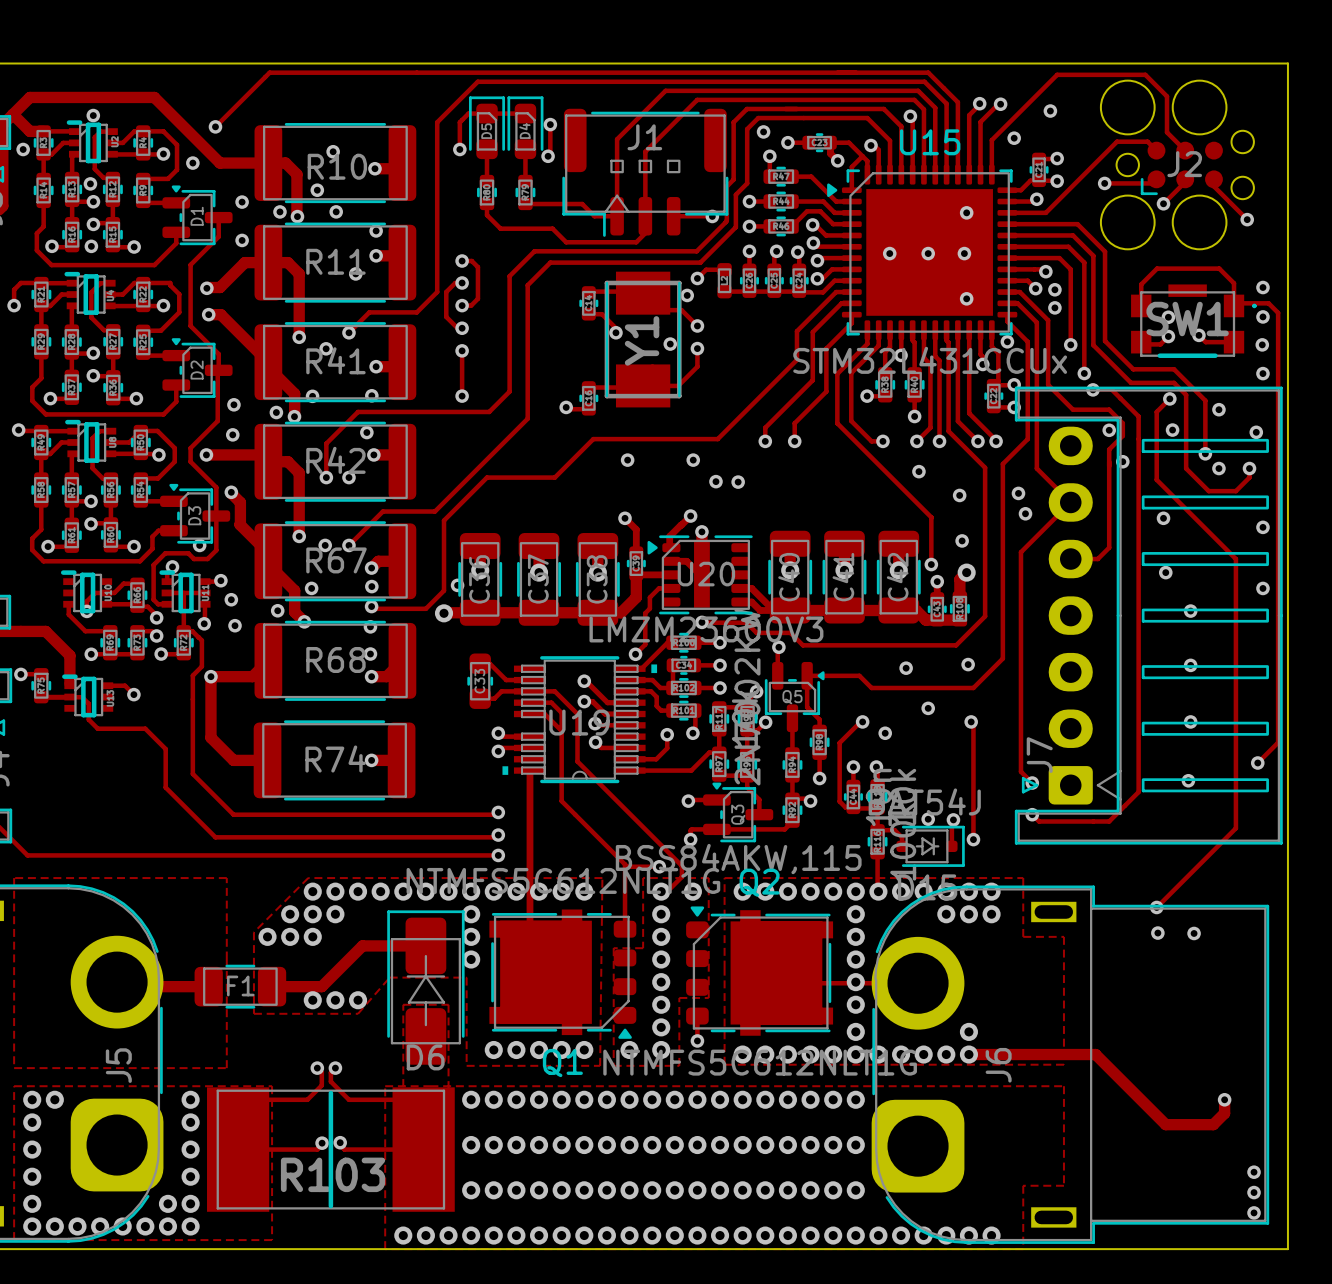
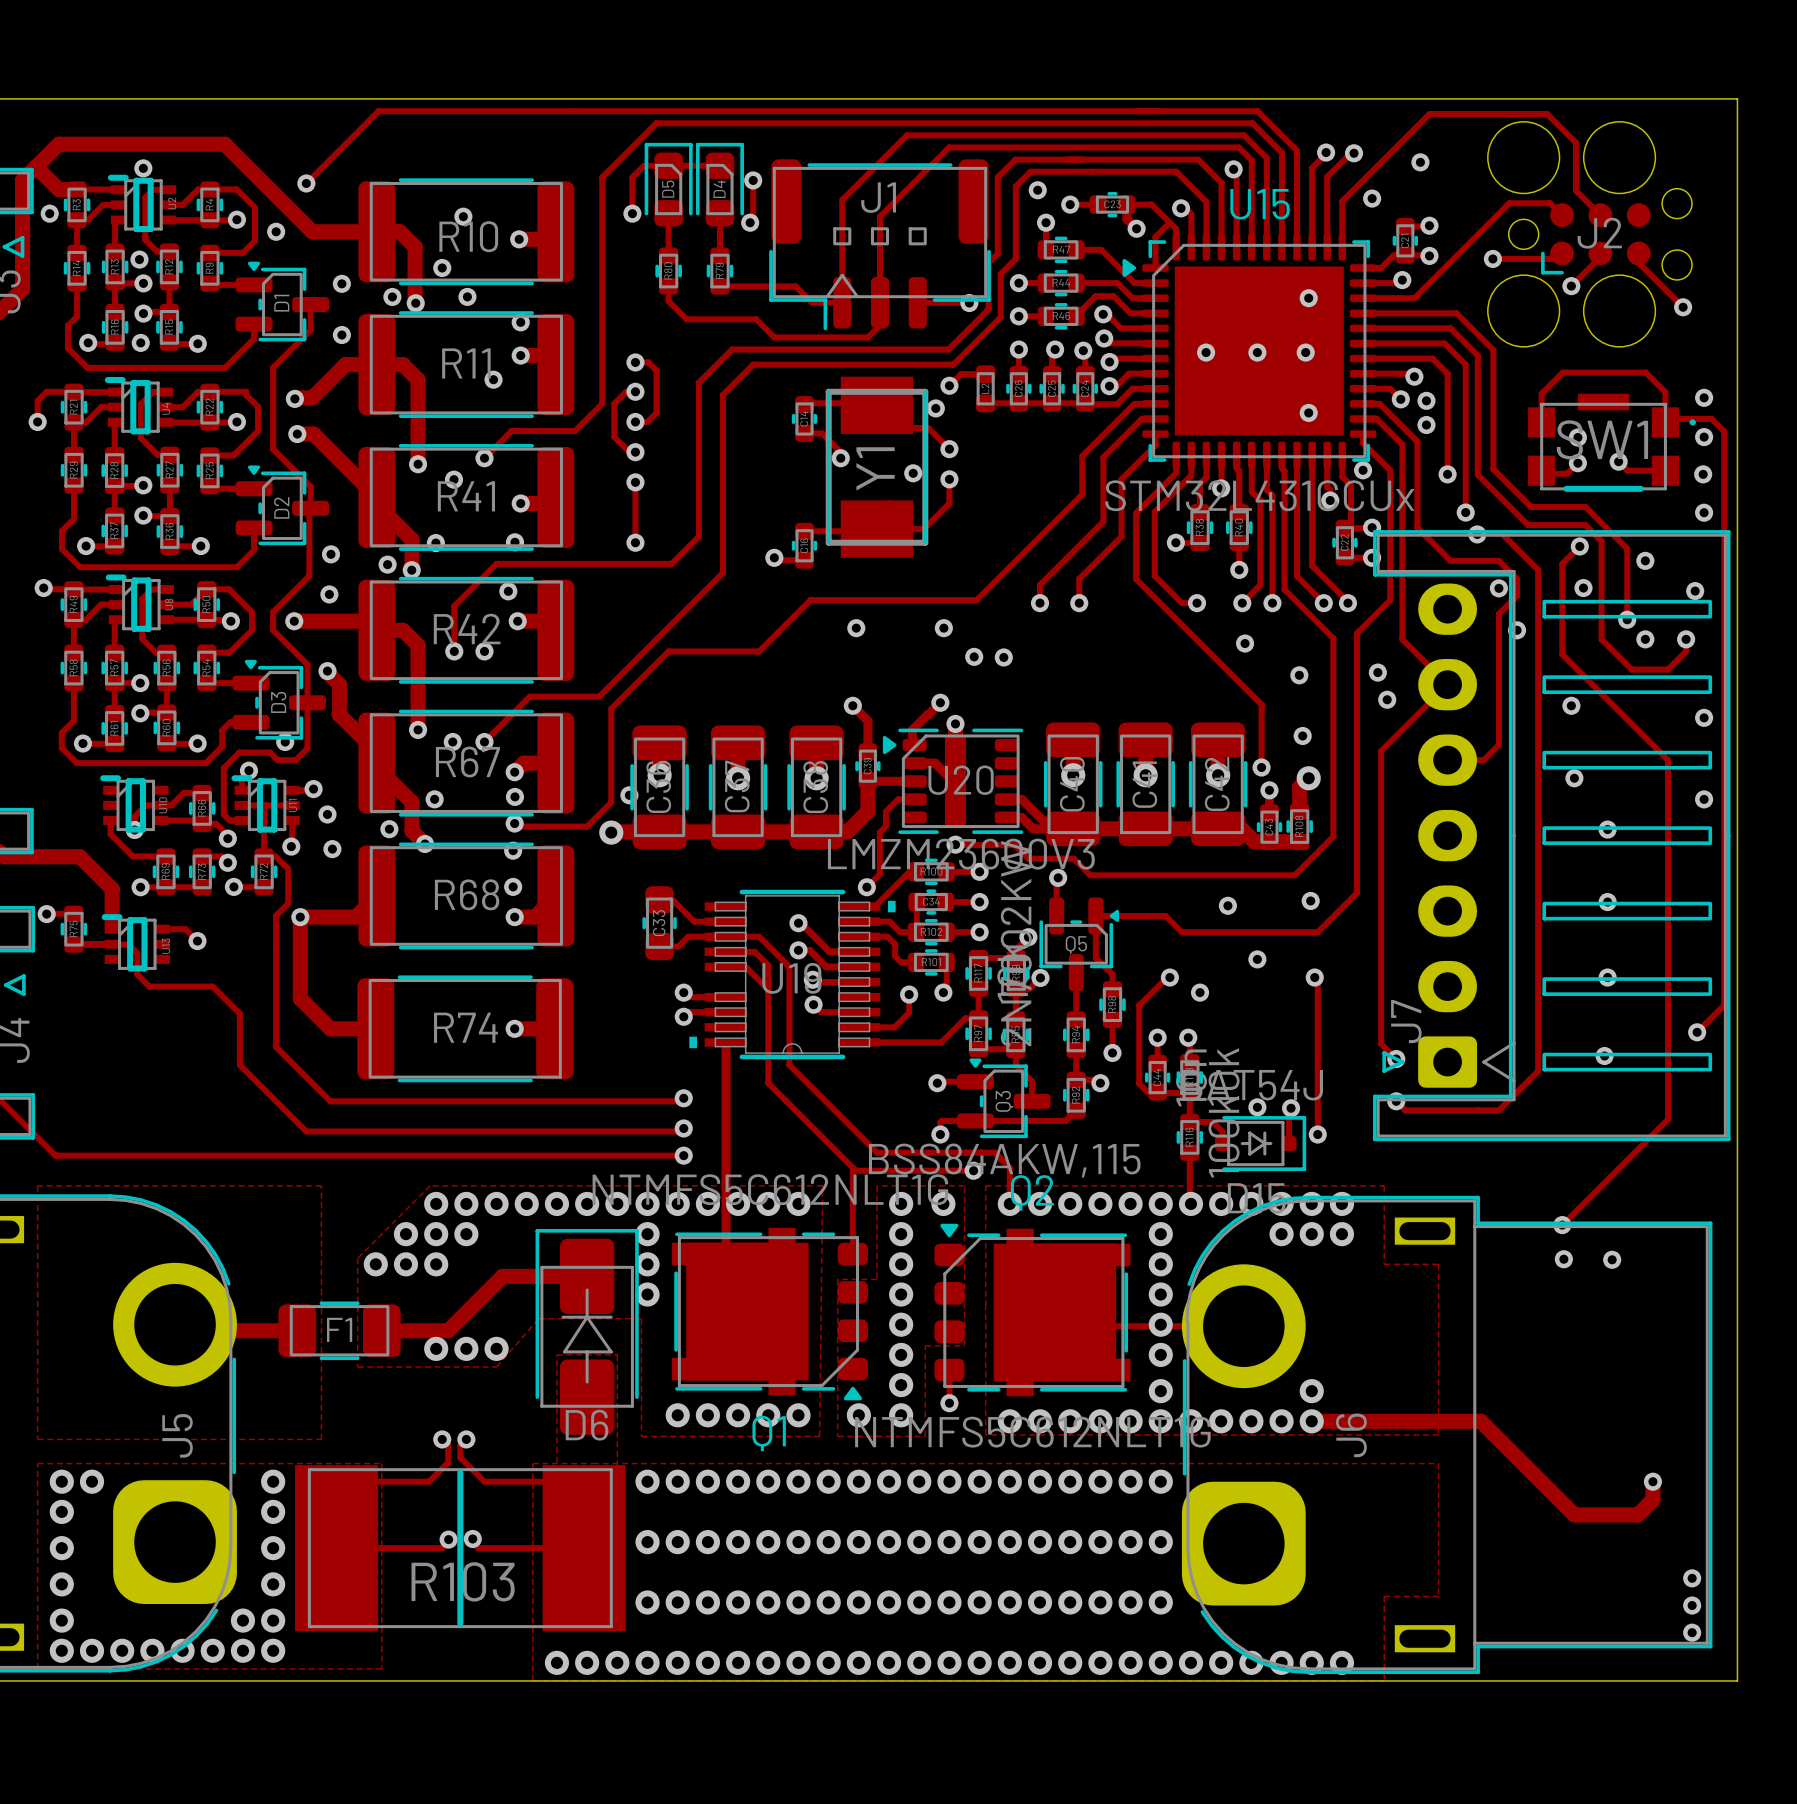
track: (577, 761) (681, 865) (681, 876) (667, 891) (661, 891) -> (789, 1030) (789, 1065) (877, 1152) (966, 1152)
track: none -> (966, 1152) (981, 1152)
track: none -> (981, 1152) (994, 1152) (1009, 1167) (1009, 1203)
track: none -> (898, 1170) (973, 1170)
via position: (659, 866) -> (973, 1170)

